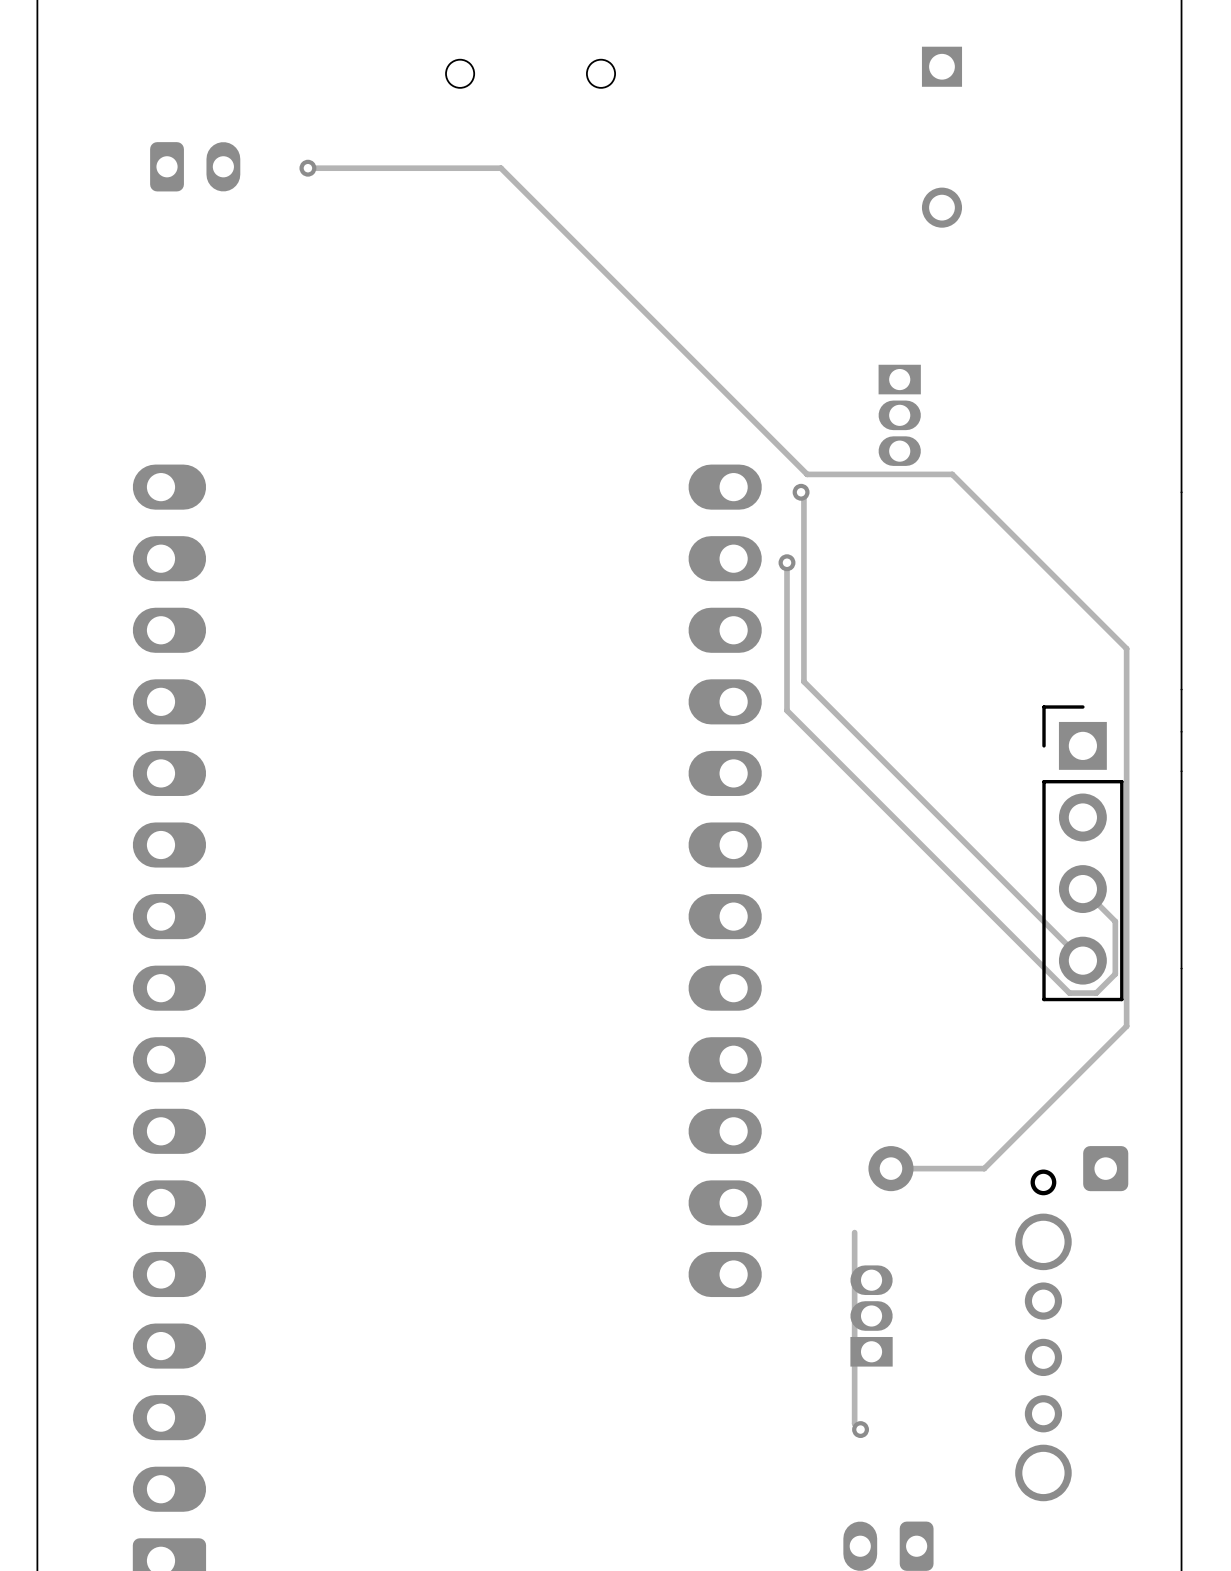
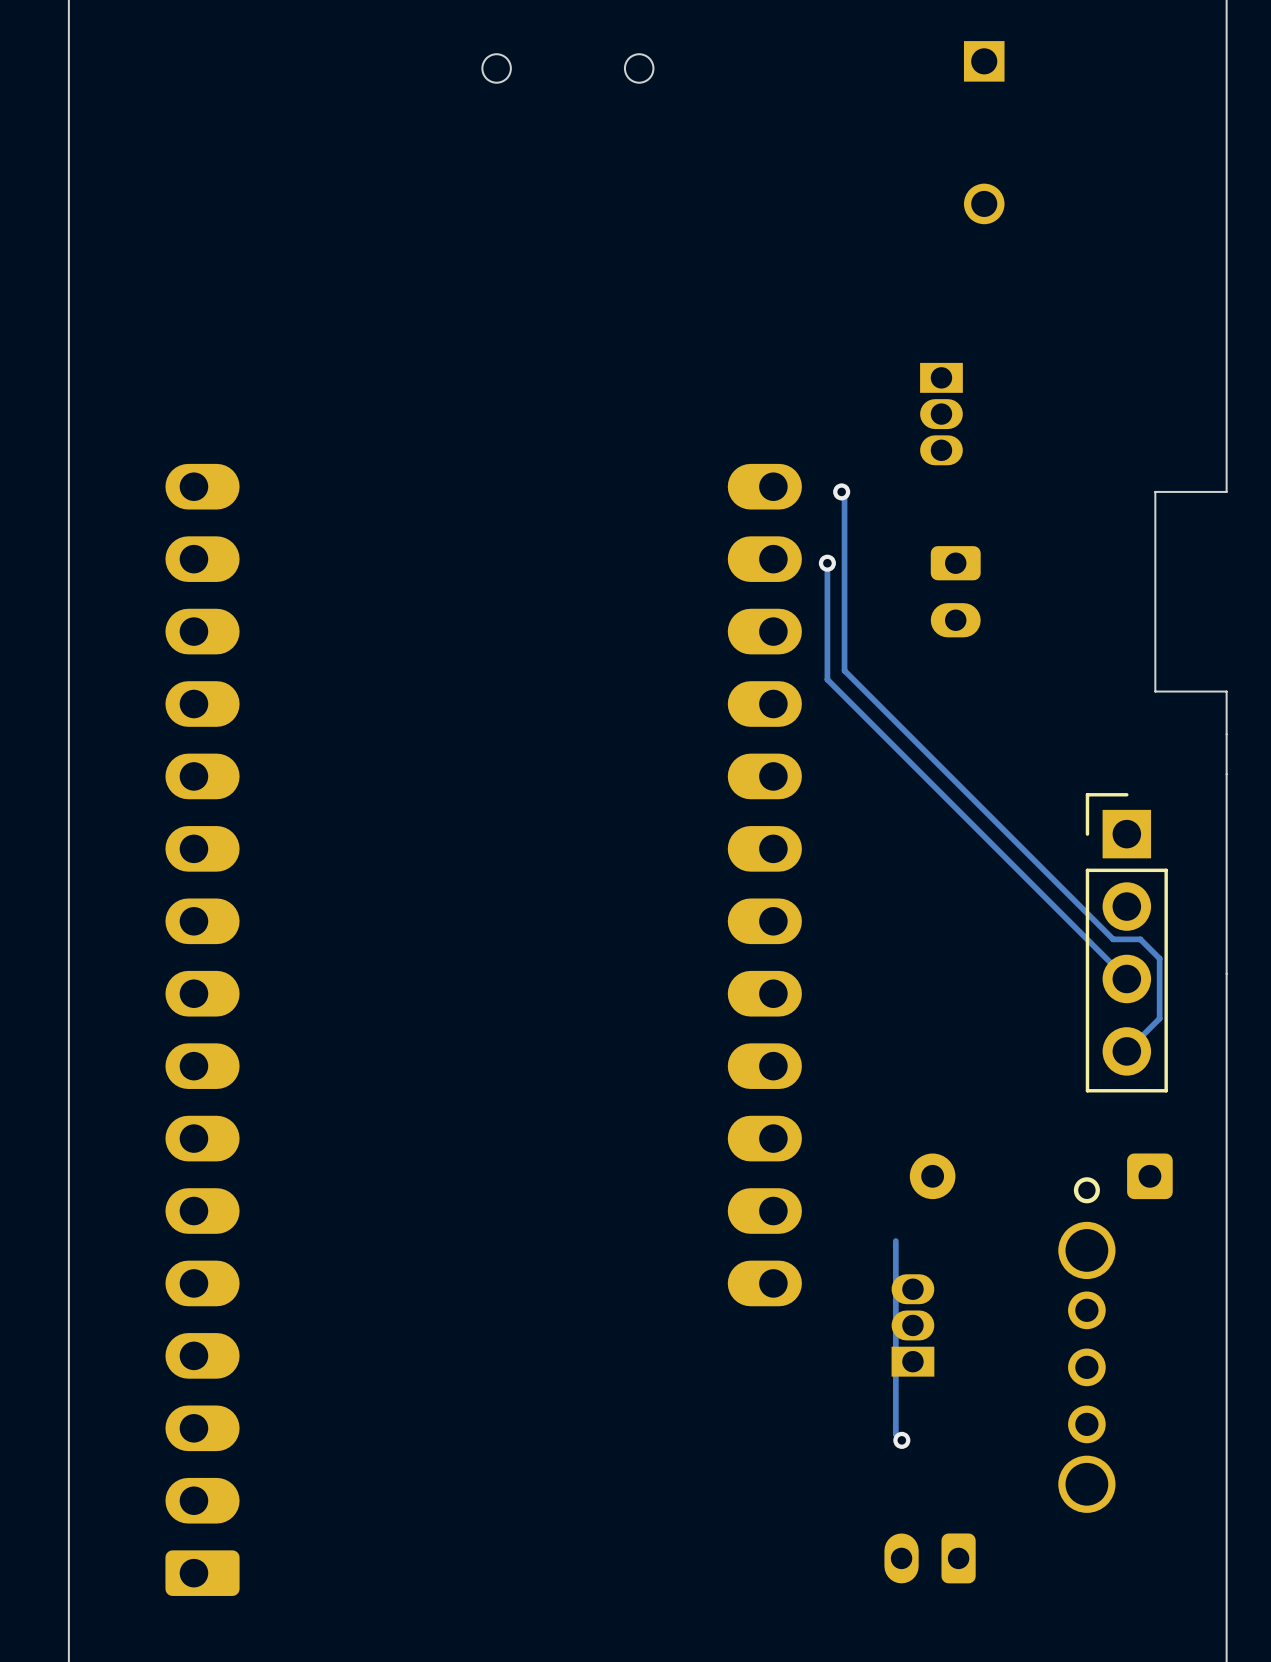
part: (195, 166) -> none
track: (307, 168) (500, 168) (807, 474) (952, 474) (1126, 648) (1126, 1026) (984, 1168) (890, 1168) -> none
via: (307, 168) -> none
board edge: (1181, 492) (1181, 689) -> (1226, 491) (1155, 491) (1155, 691) (1226, 691)
part: none -> (955, 591)
track: (803, 668) (803, 681) (1082, 960) -> (844, 670) (1113, 939) (1140, 939) (1159, 958)
track: (787, 677) (787, 710) (1069, 993) (1096, 993) (1115, 974) -> (827, 679) (1126, 978)
part position: (1082, 853) -> (1126, 942)
track: (1082, 889) (1115, 921) (1115, 953) -> none
track: none -> (1159, 979) (1159, 1018) (1126, 1051)

